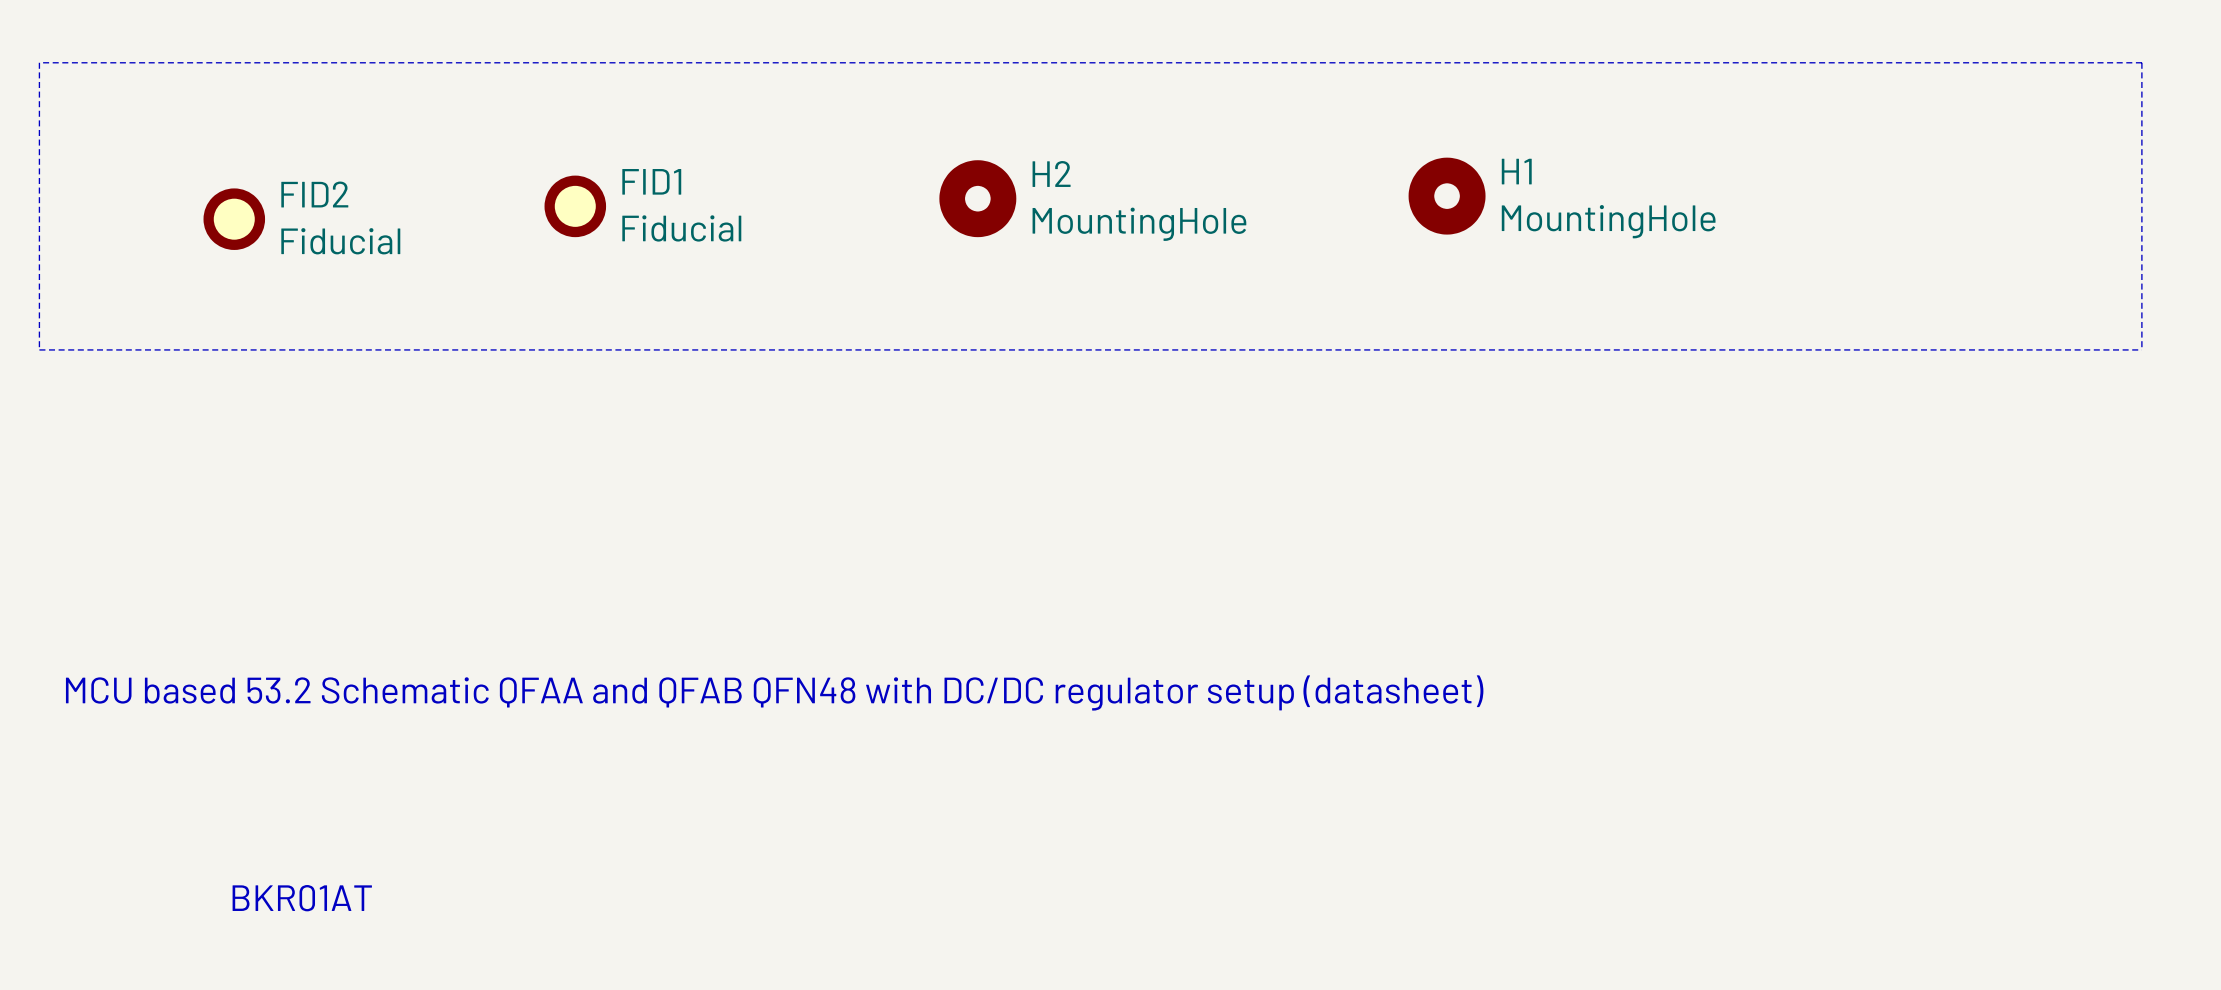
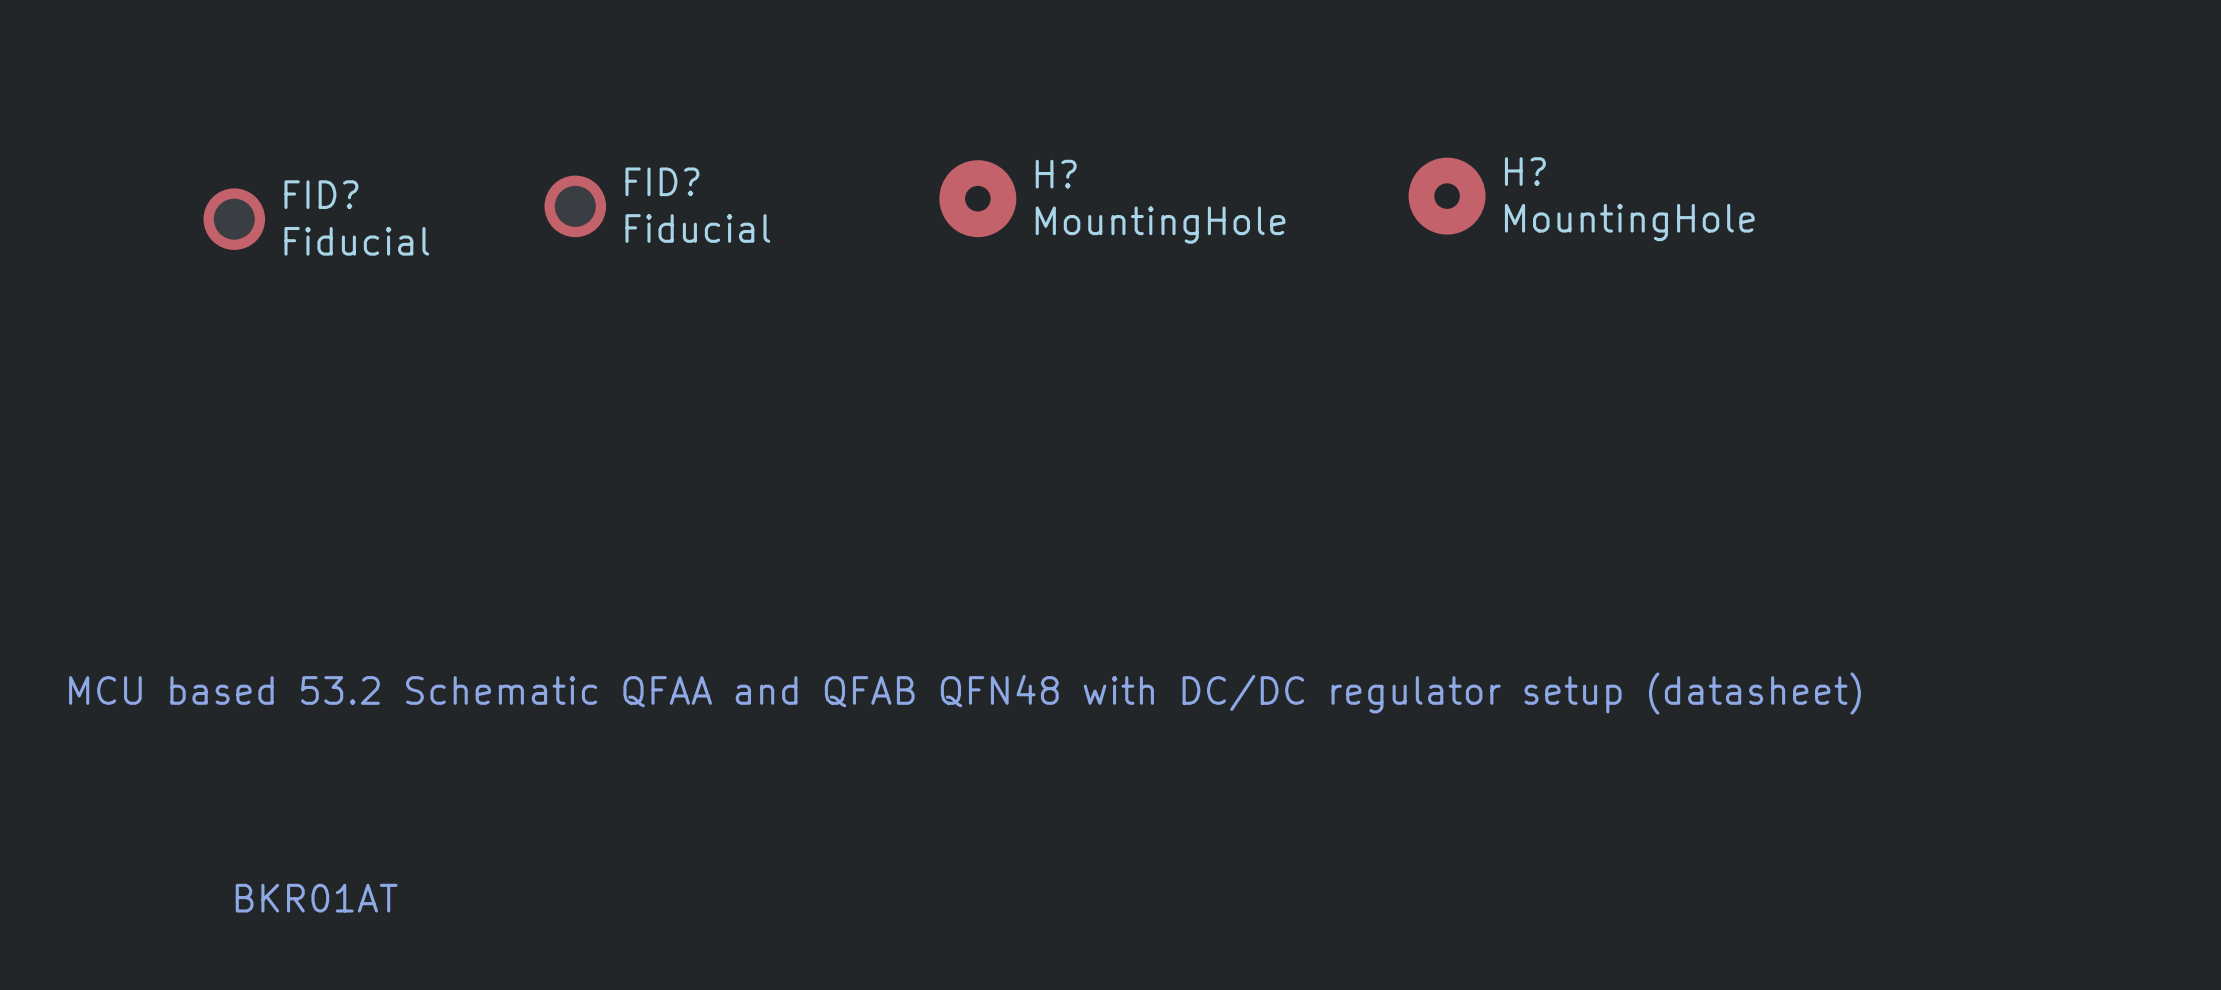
line: (39, 62) (39, 349) (2141, 349) (2141, 62) (41, 62) -> none
H1 name: H1 (1516, 171) -> H? (1525, 171)
H2 name: H2 (1051, 173) -> H? (1056, 174)
FID1 name: FID1 (651, 181) -> FID? (662, 181)
FID2 name: FID2 (314, 194) -> FID? (321, 194)

